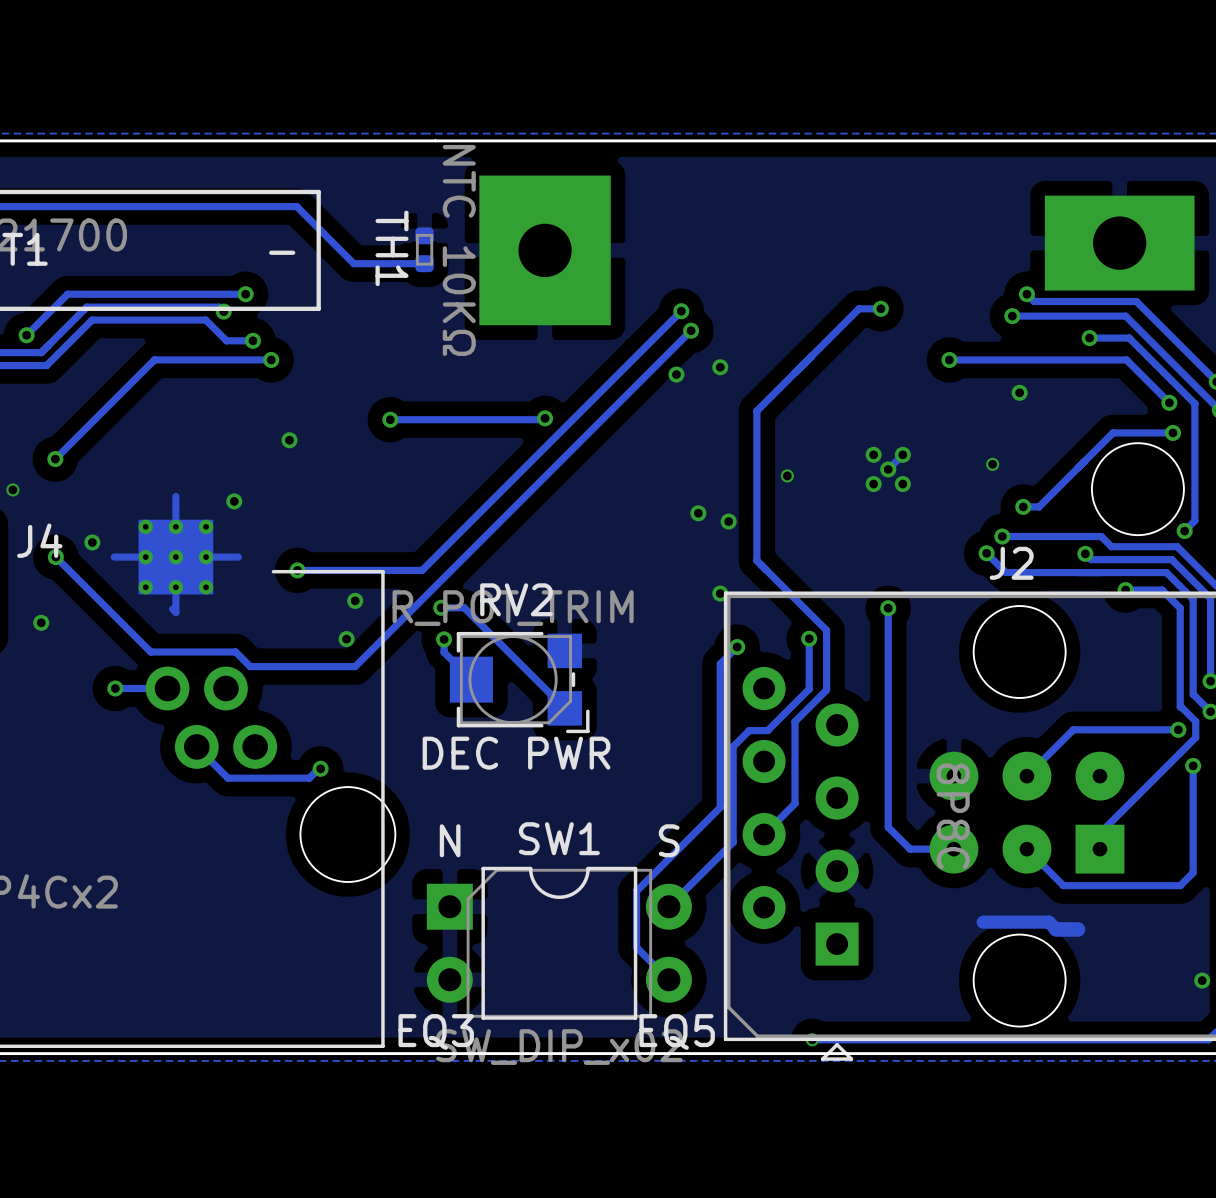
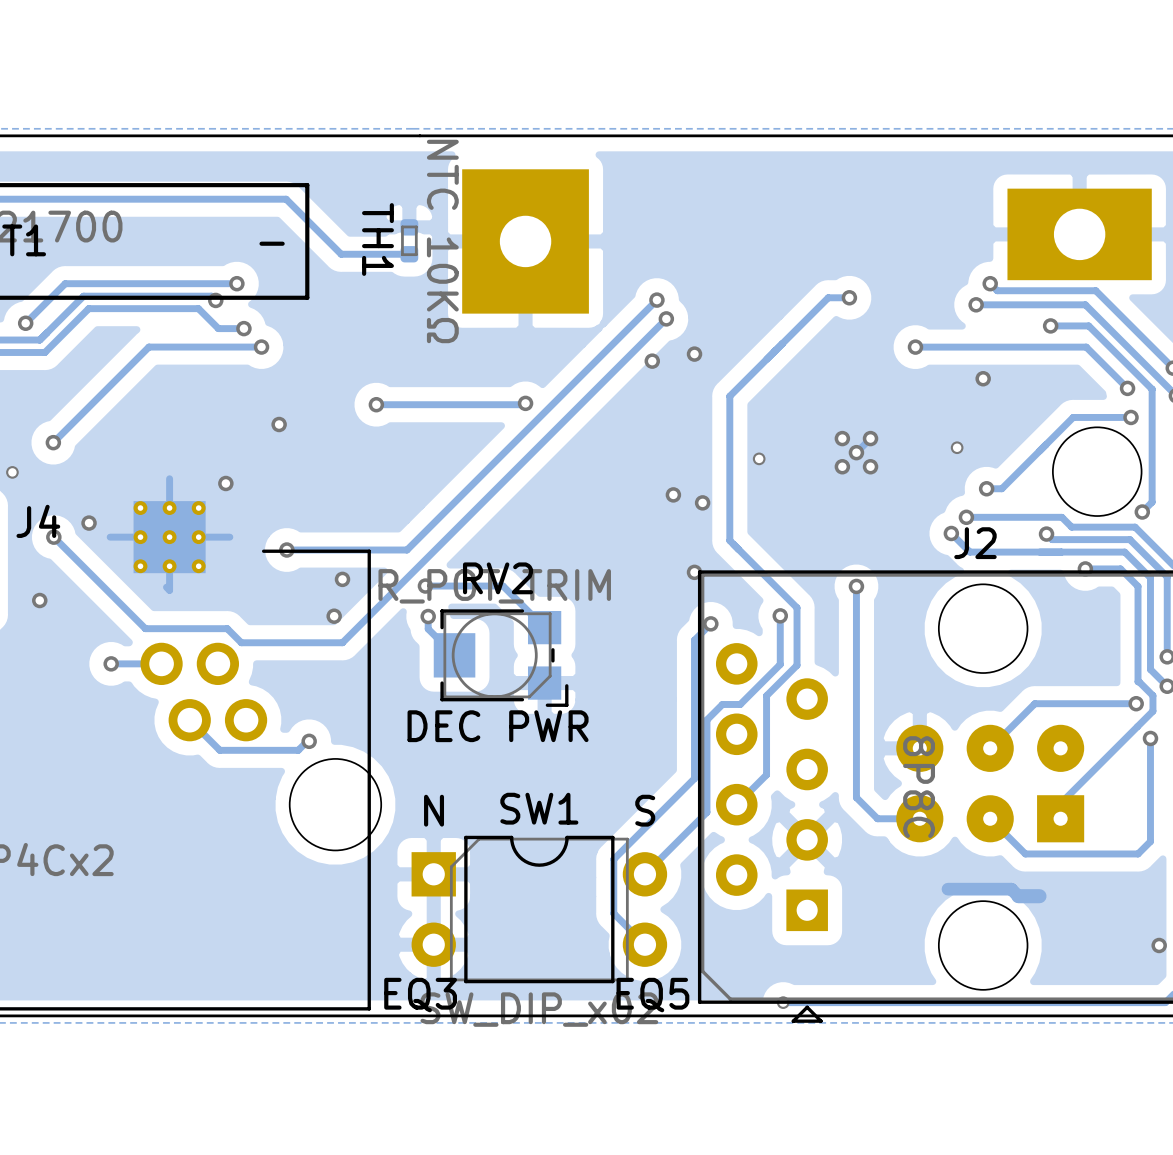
track: (464, 607) (564, 708) -> (447, 586) (503, 586) (544, 627)

